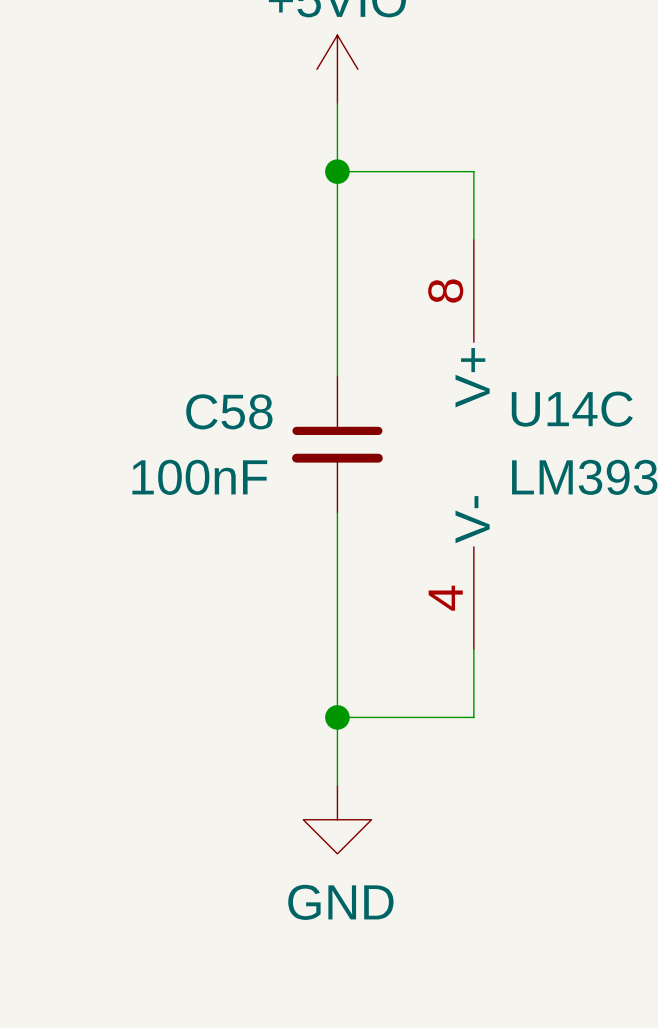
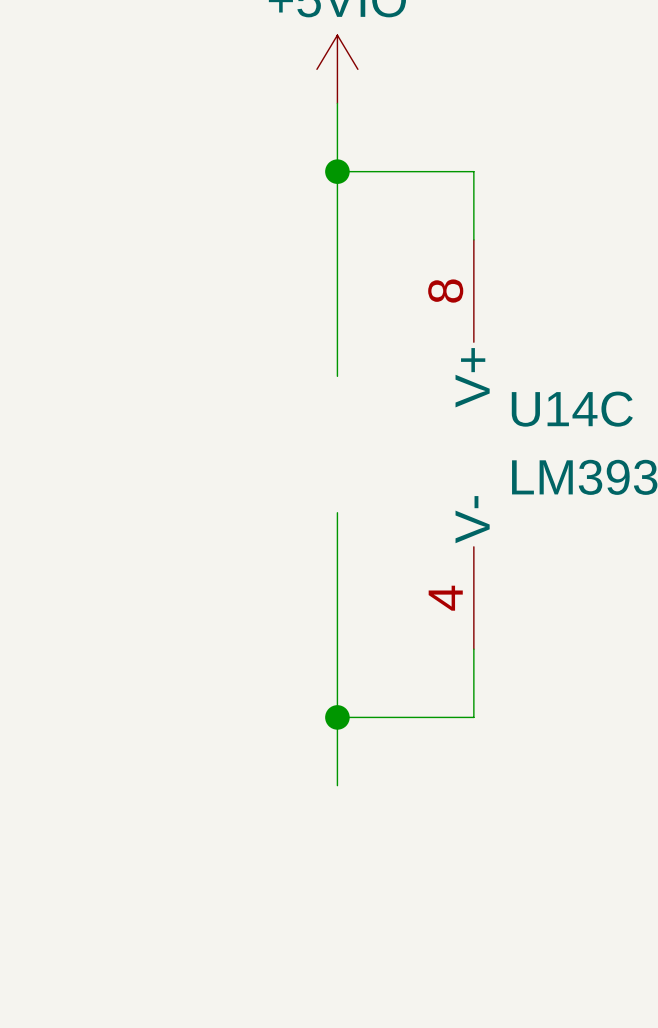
C58: 100nF (337, 444) -> none
power symbol: GND (337, 819) -> none

